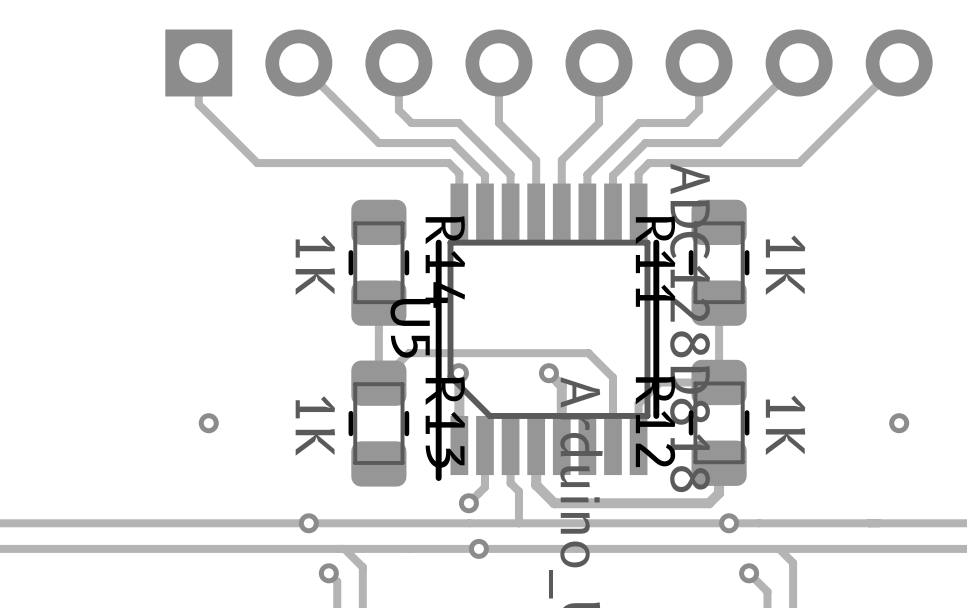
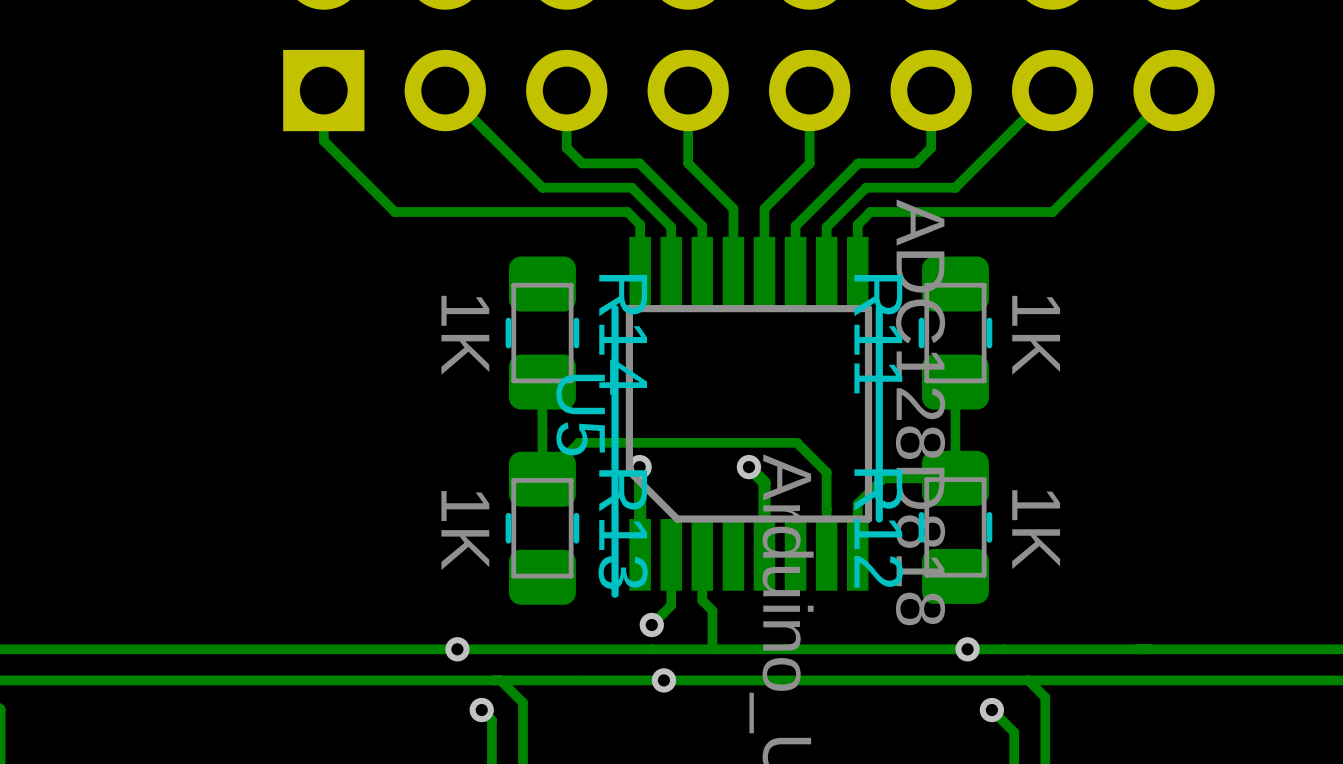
via: (208, 423) -> none
via: (899, 423) -> none
track: (536, 445) (536, 485) (554, 503) (709, 503) (719, 493) (719, 463) -> none

